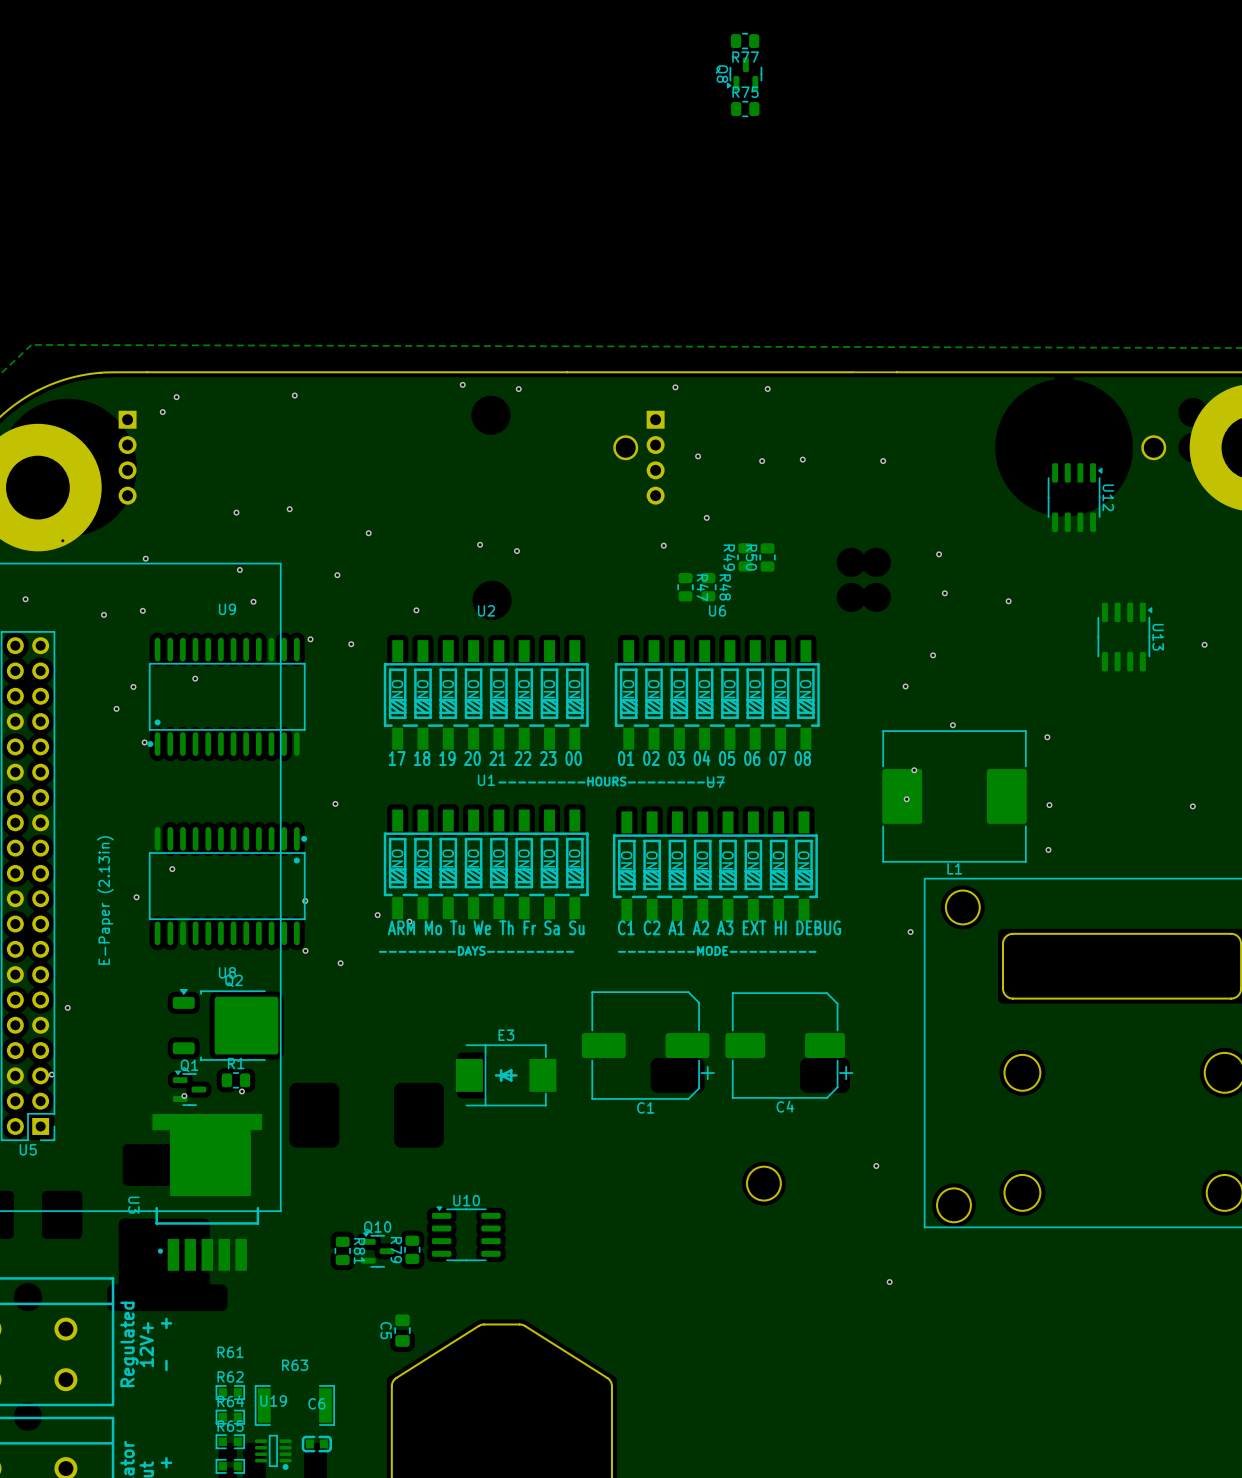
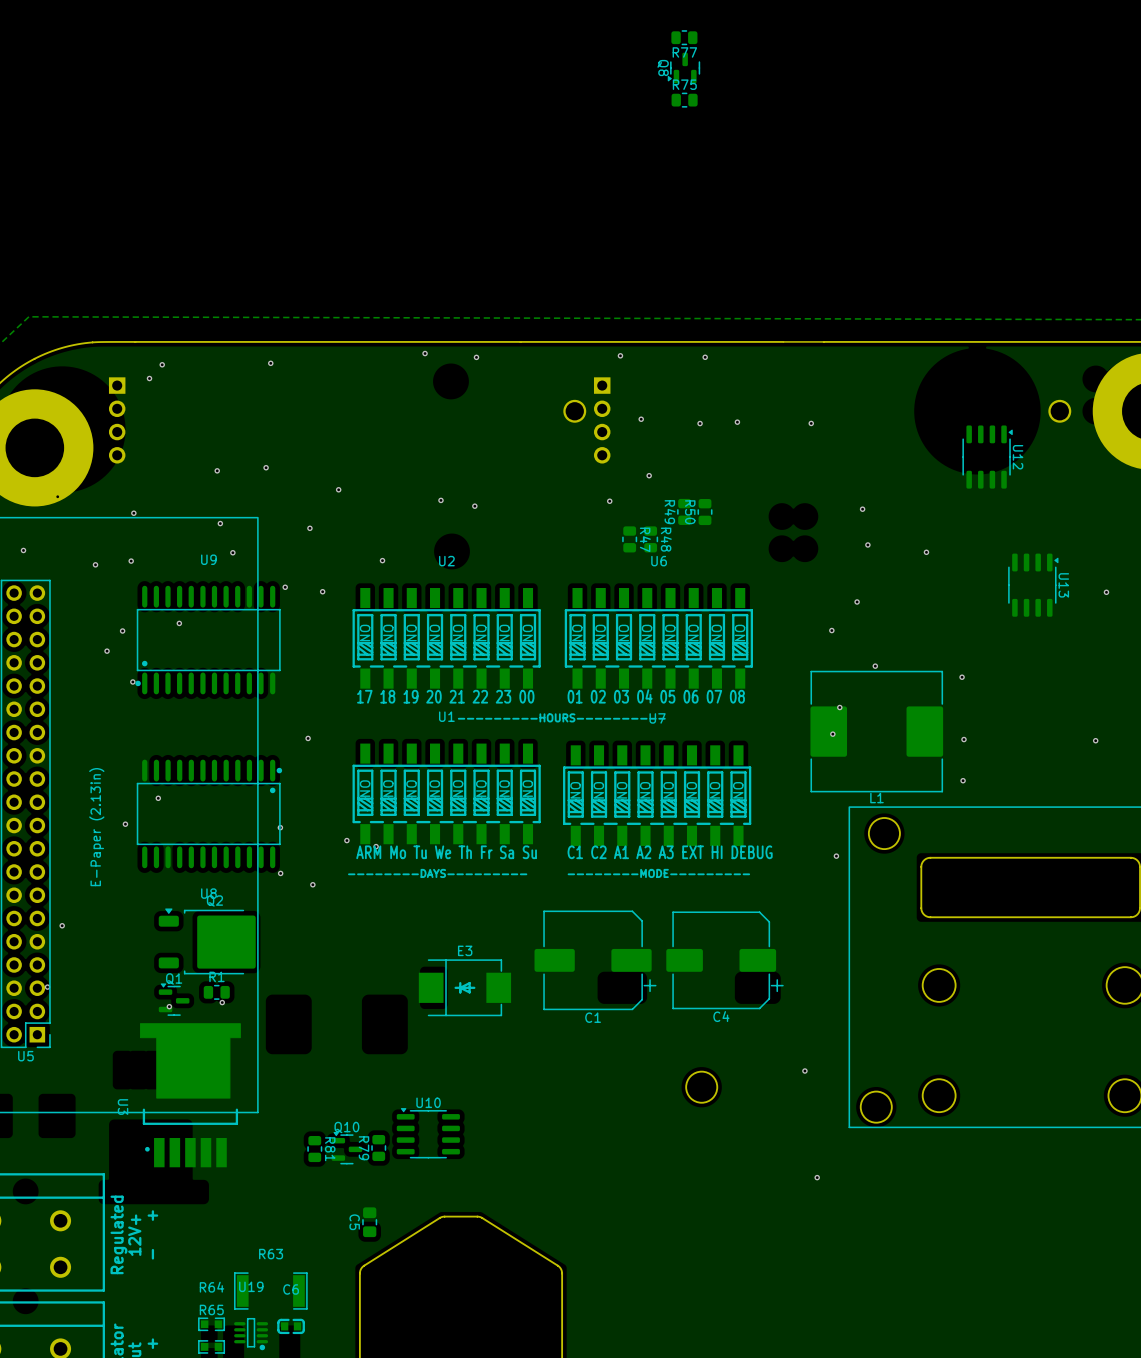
R61: (230, 1392) -> none
R62: (230, 1417) -> none

